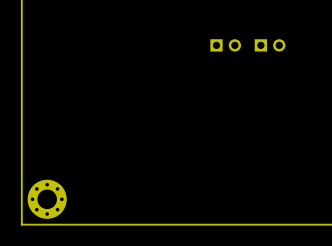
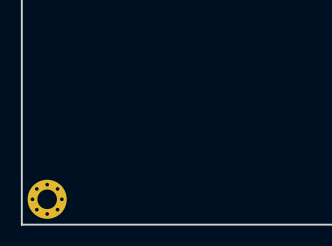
part: (225, 45) -> none
part: (270, 45) -> none

